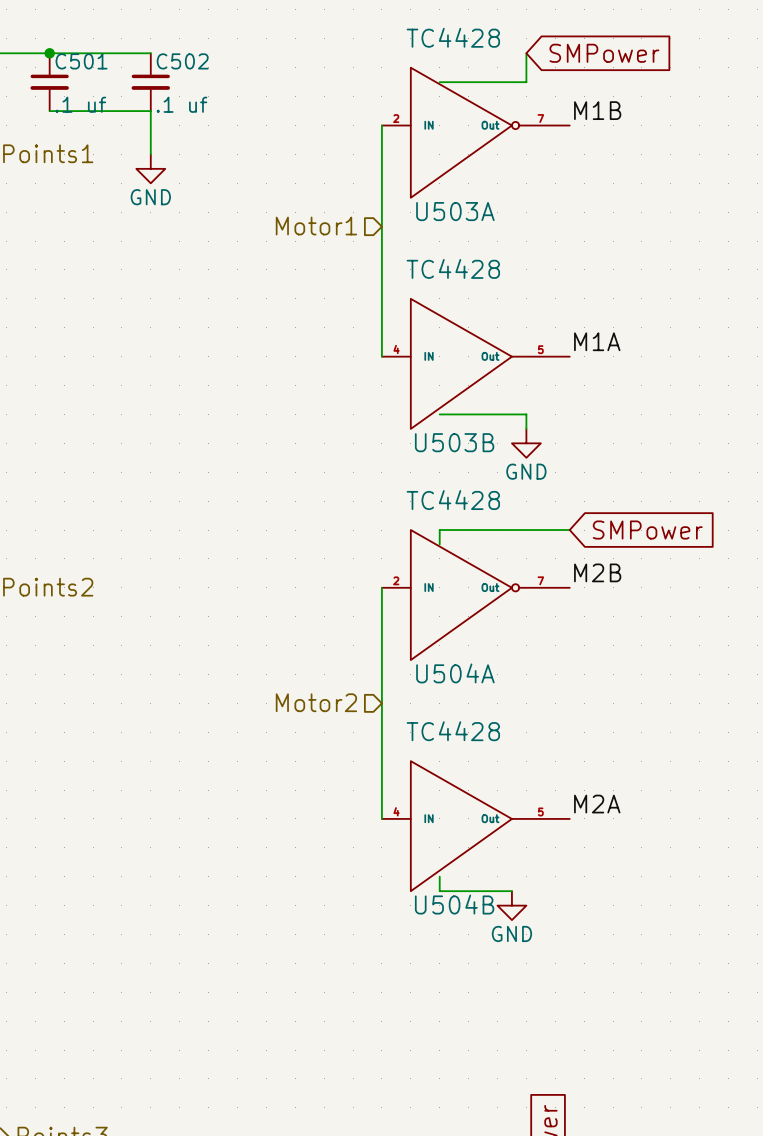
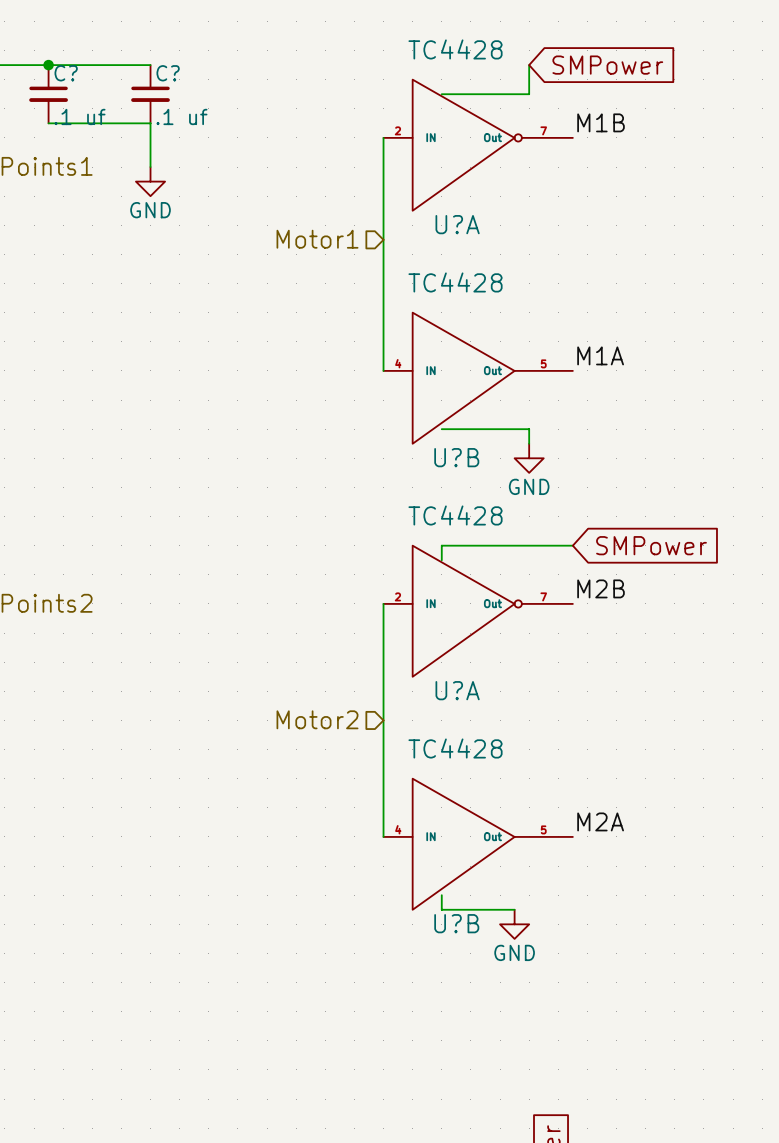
C501 name: C501 (81, 61) -> C? (66, 73)
C502 name: C502 (182, 61) -> C? (168, 73)
U503A name: U503A (455, 211) -> U?A (457, 224)
U503B name: U503B (454, 442) -> U?B (456, 457)
U504A name: U504A (455, 673) -> U?A (457, 690)
U504B name: U504B (454, 904) -> U?B (456, 923)

